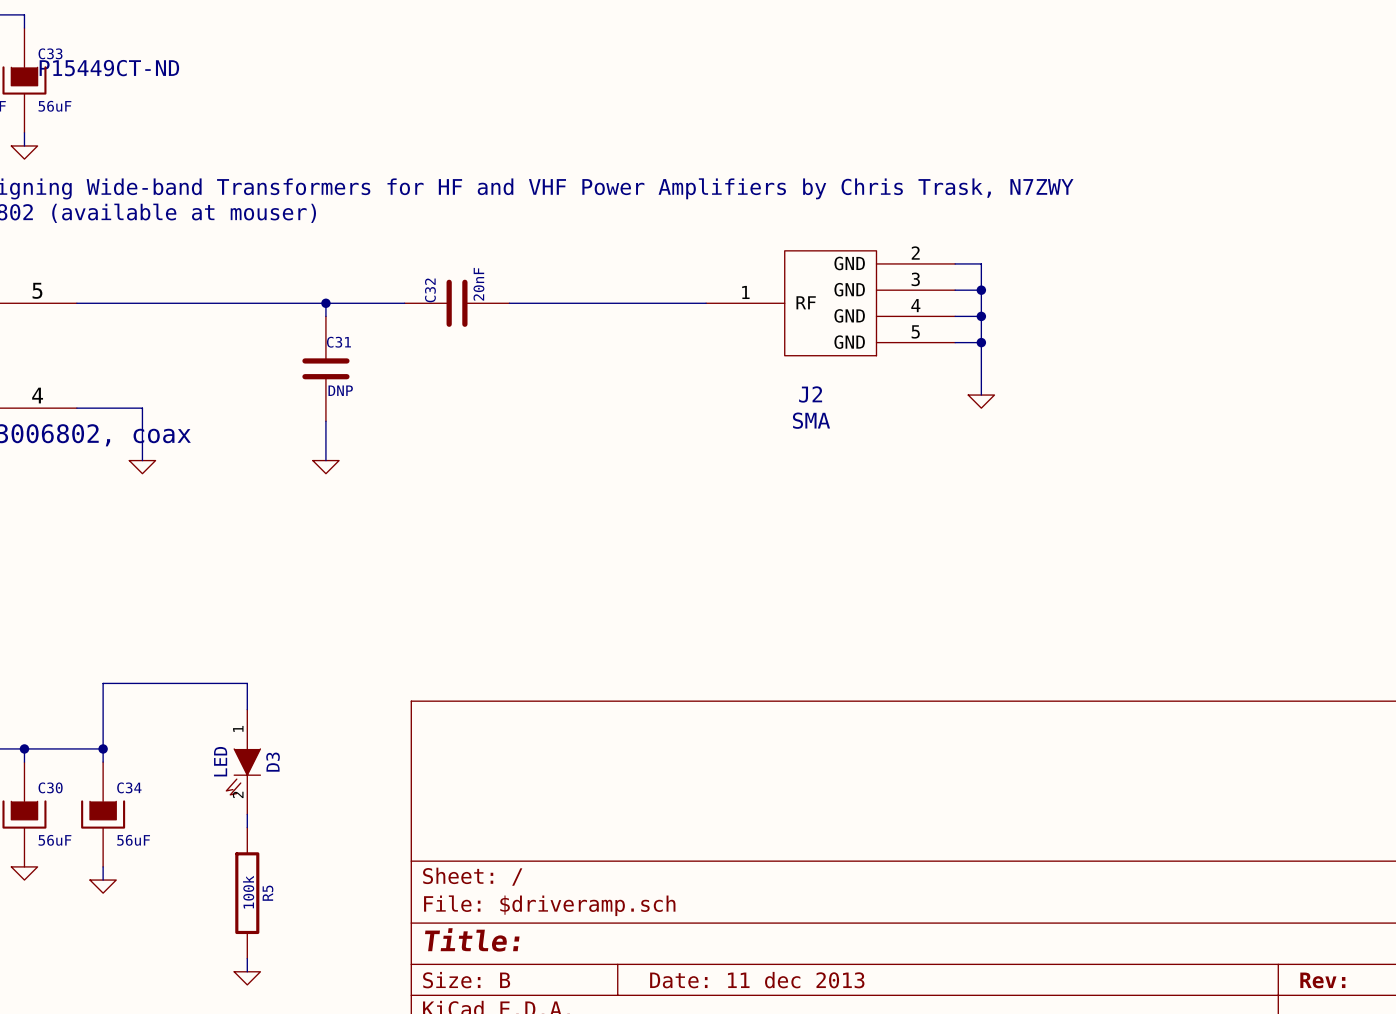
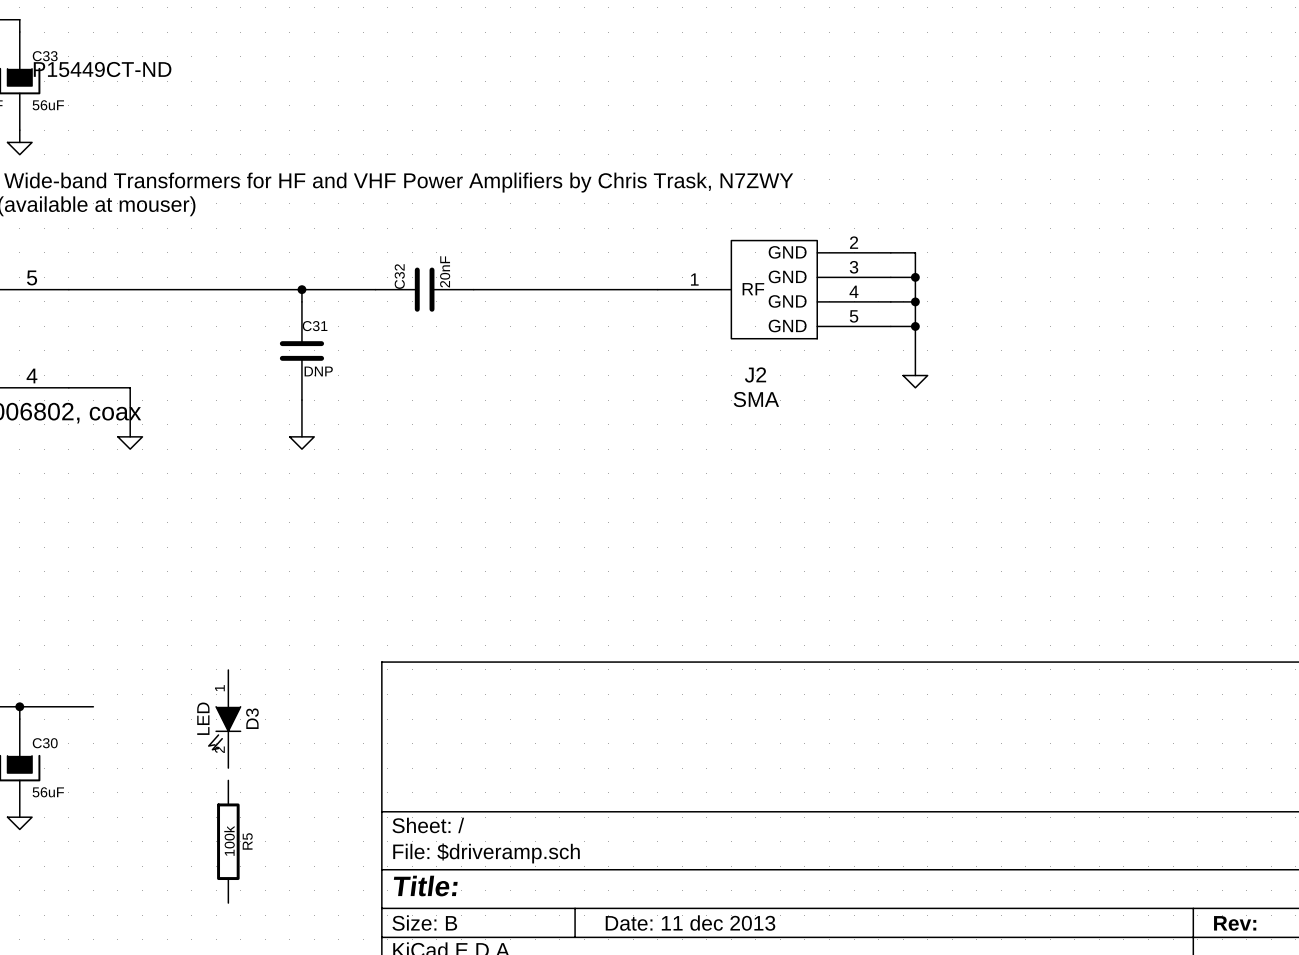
wire: (247, 709) (247, 683) (103, 683) (103, 762) -> none
junction: (103, 748) -> none
C34: 56uF (103, 814) -> none
wire: (247, 814) (247, 827) -> none
wire: (103, 866) (103, 880) -> none
power symbol: (103, 886) -> none
wire: (247, 958) (247, 971) -> none
power symbol: (247, 978) -> none

